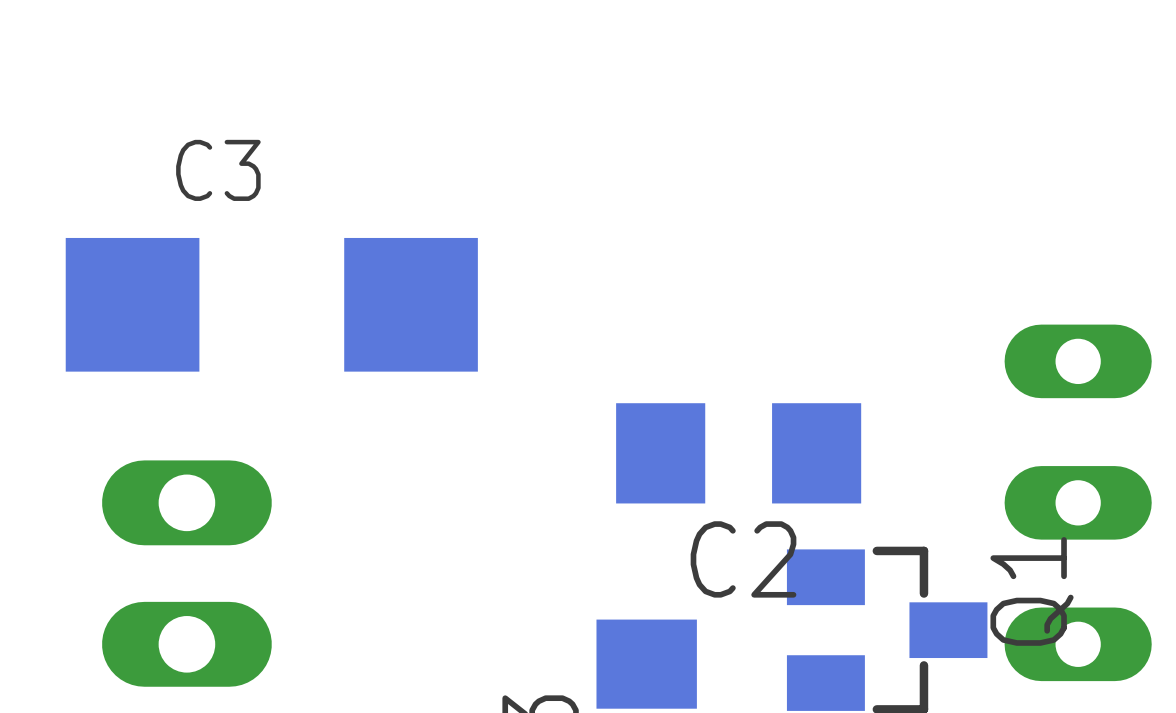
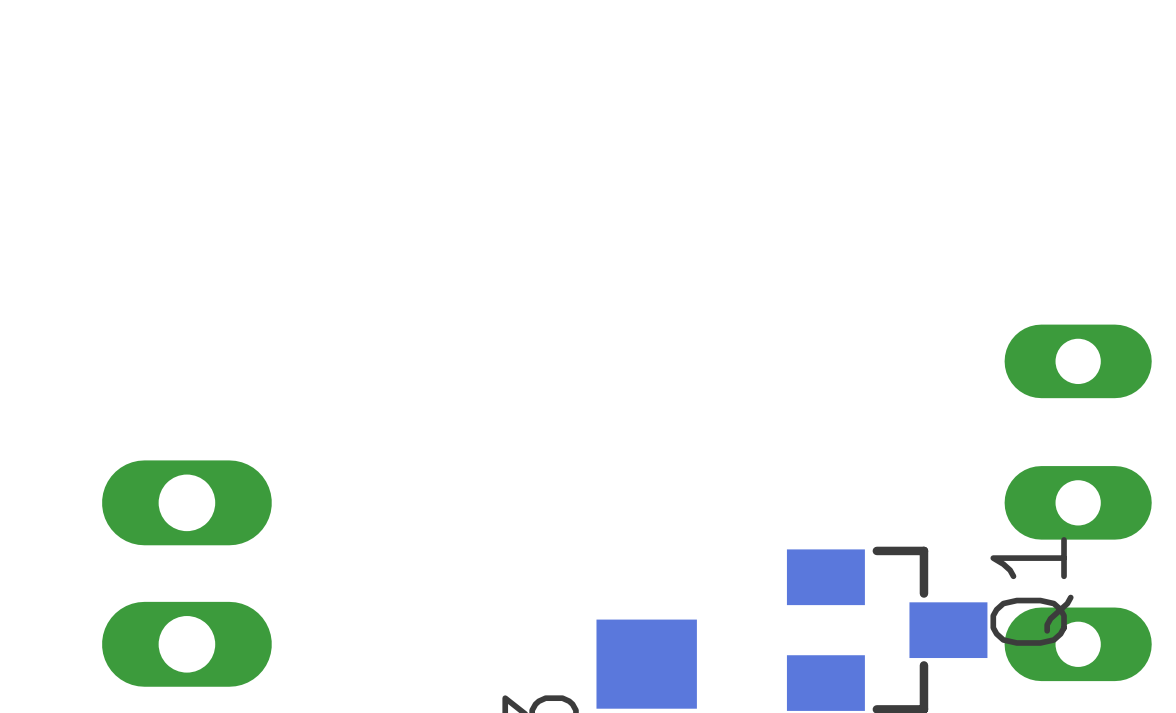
C3: (271, 304) -> none
C2: (738, 453) -> none

